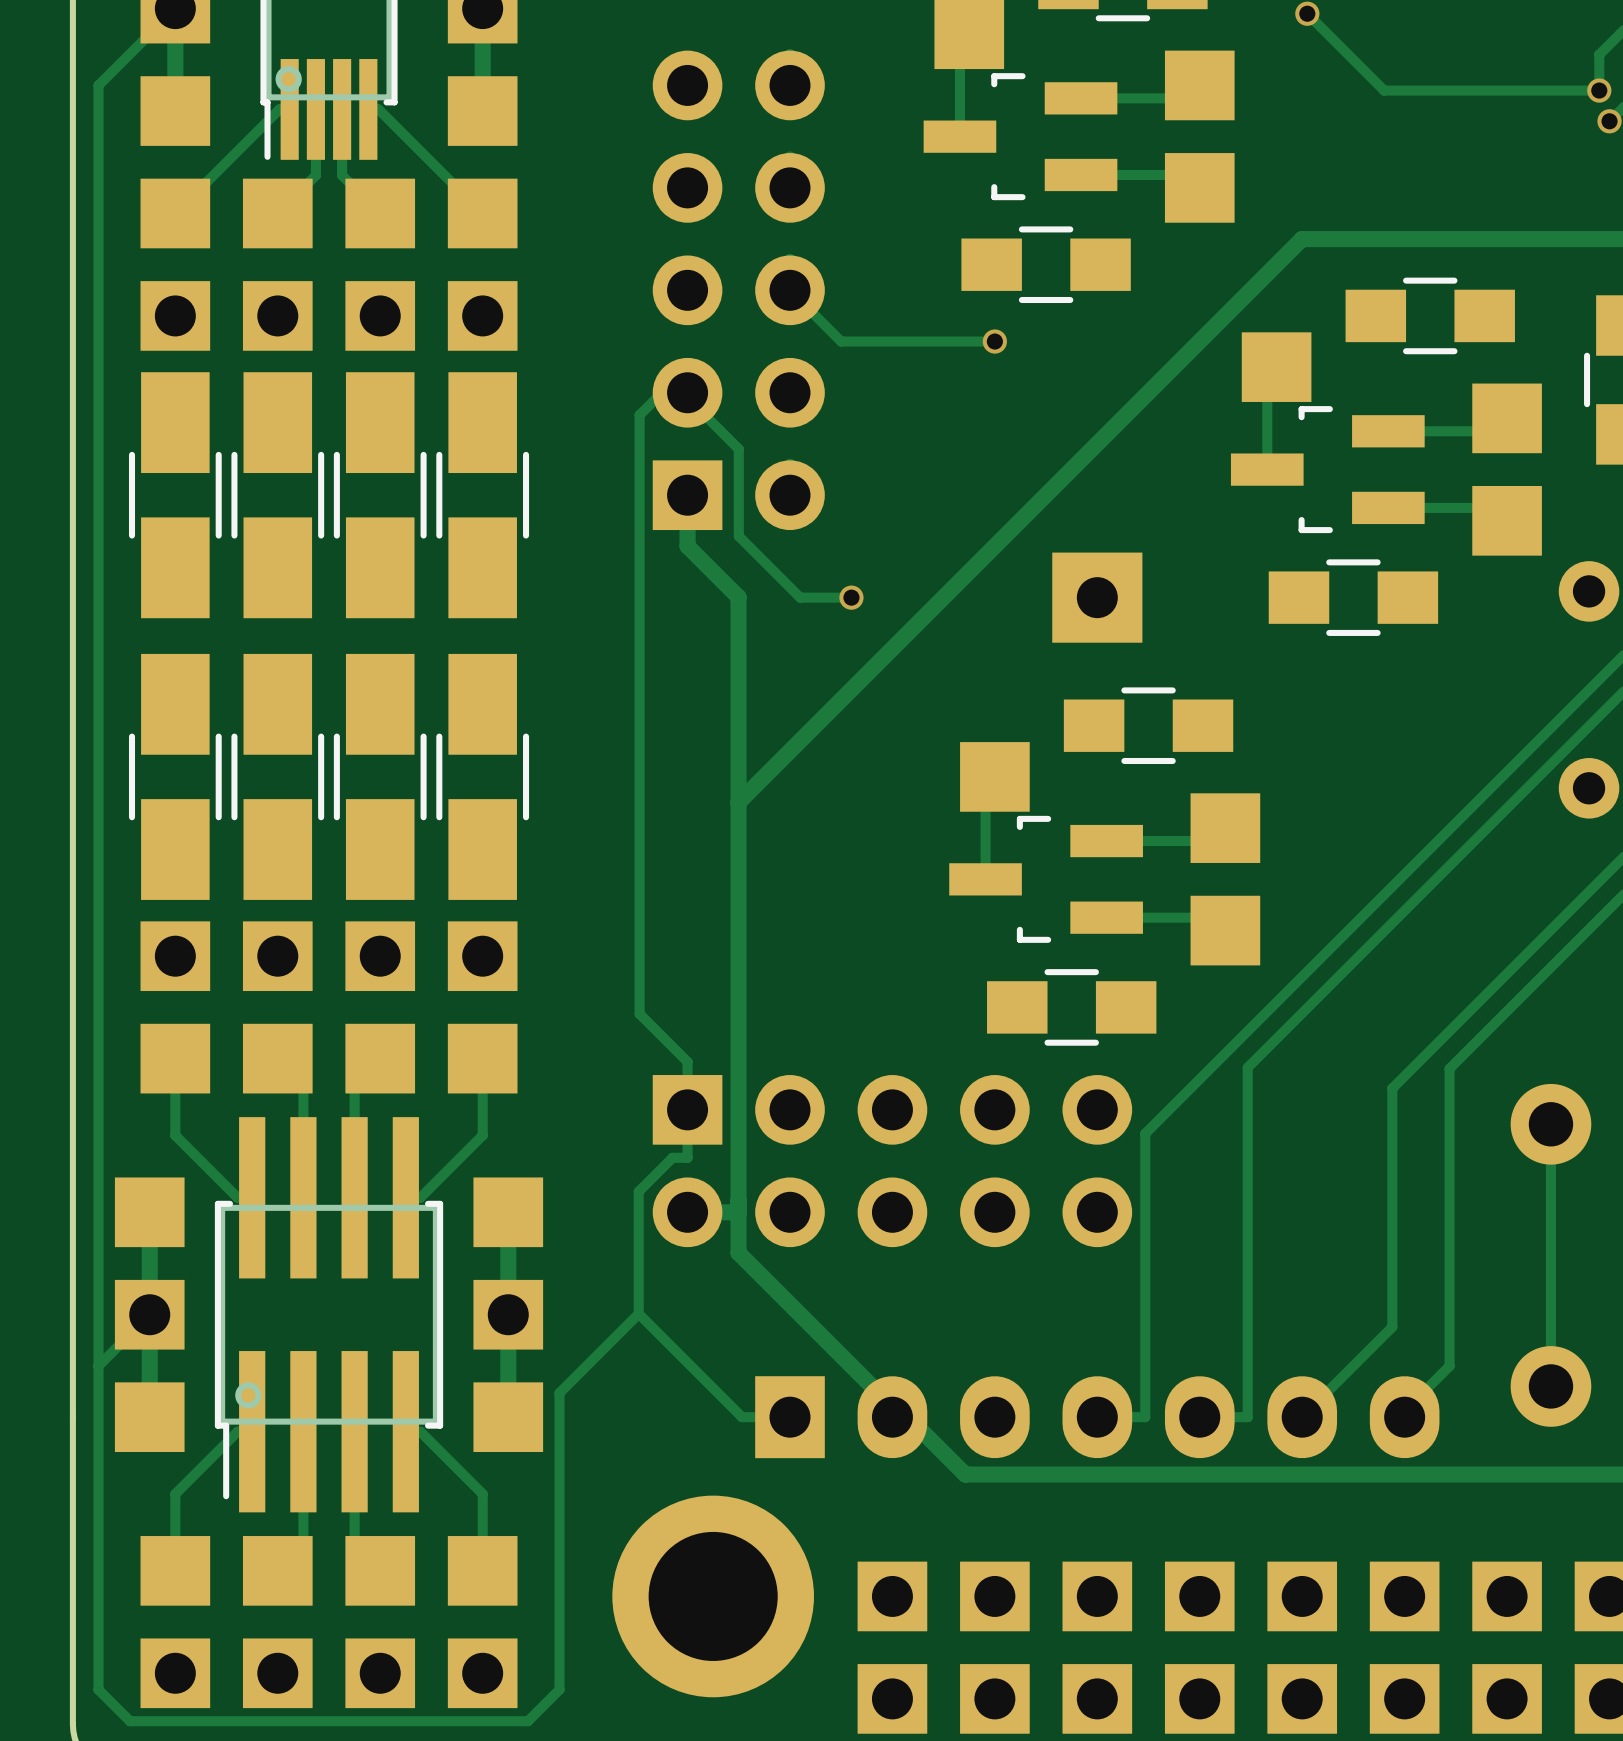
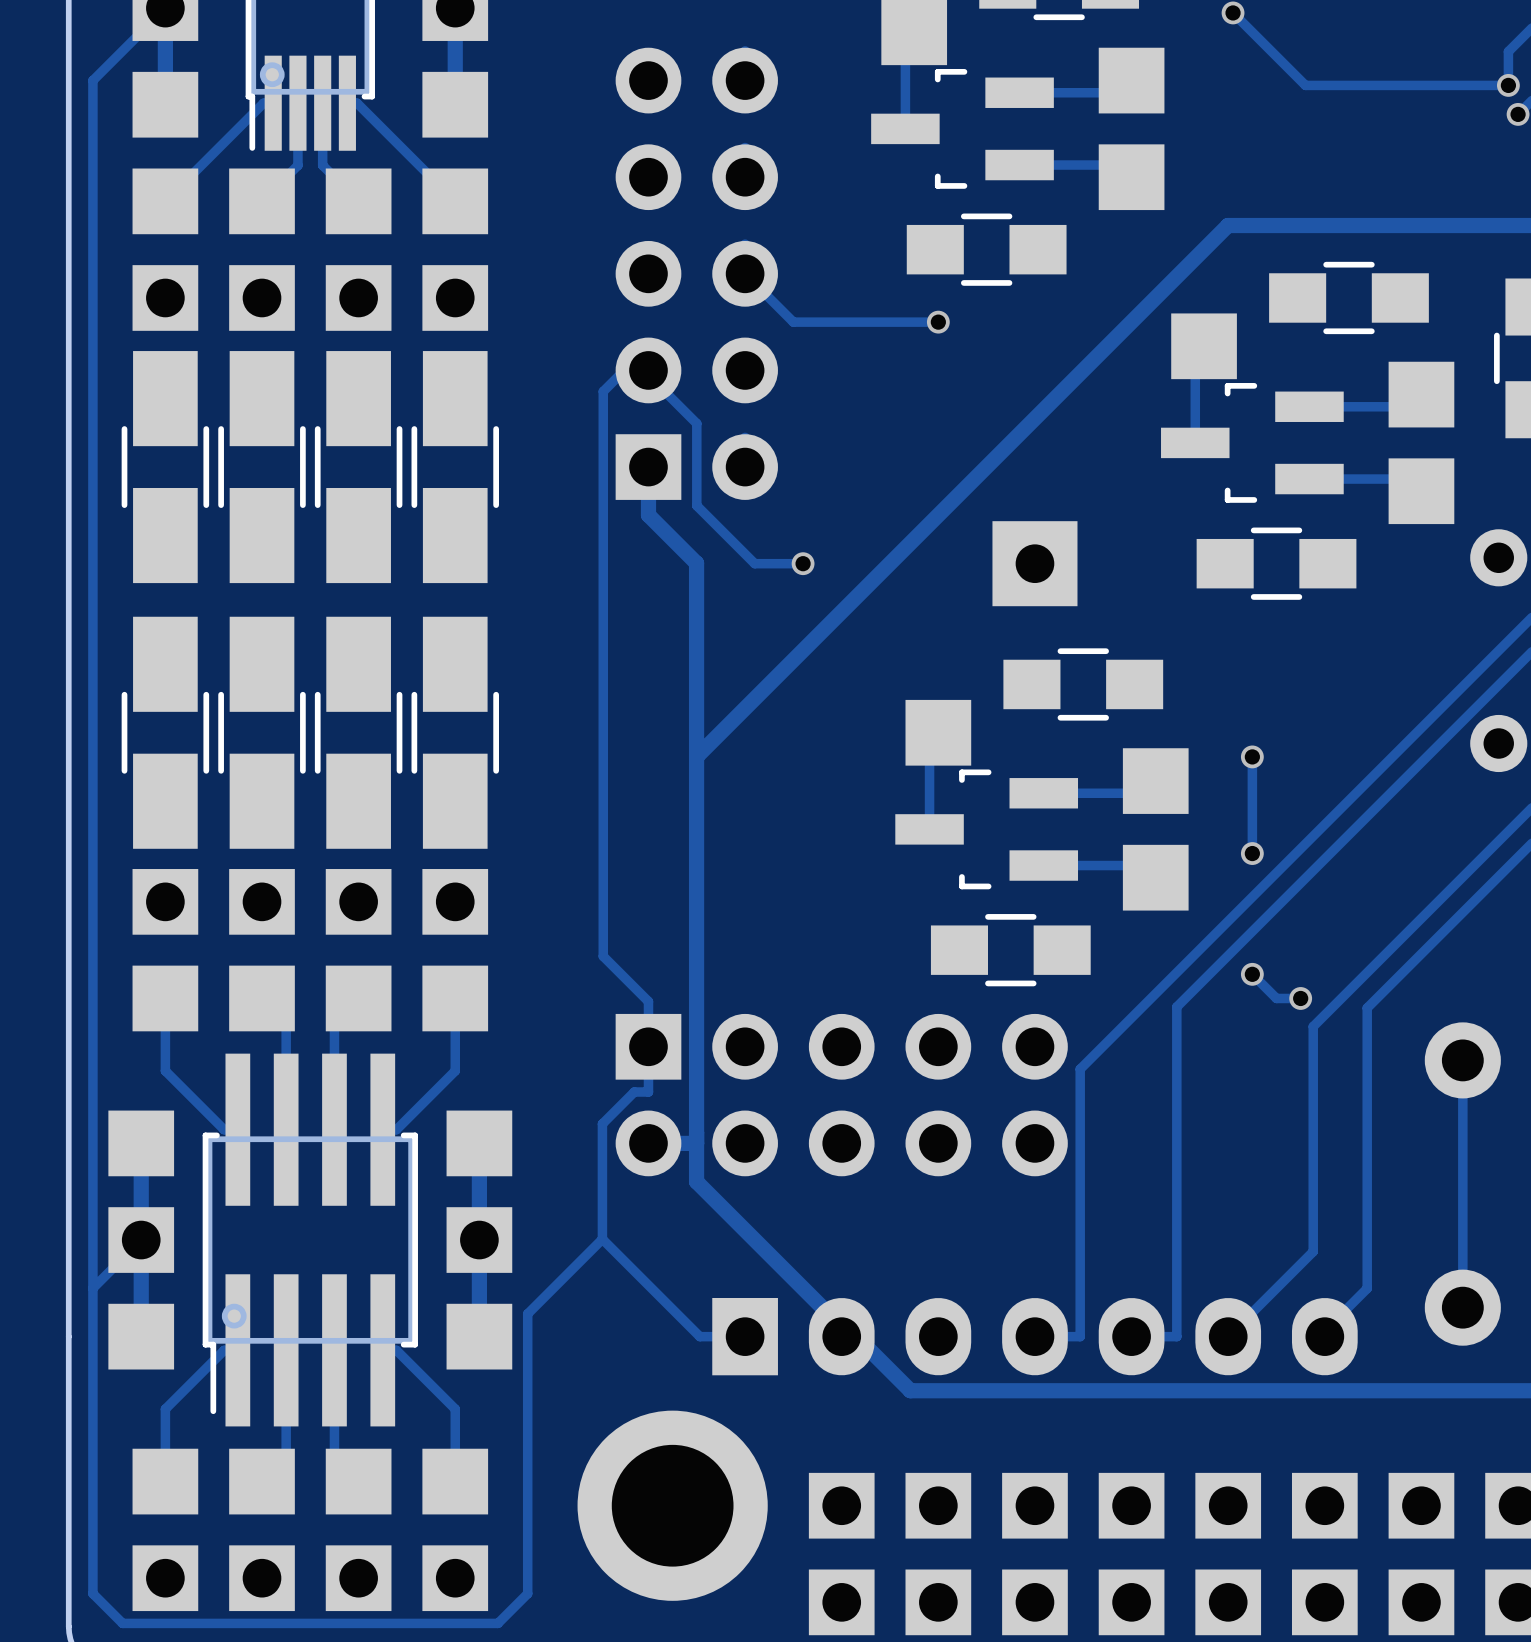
track: none -> (1252, 756) (1252, 853)
via: none -> (1252, 756)
via: none -> (1252, 853)
track: none -> (1252, 974) (1276, 998) (1300, 998)
via: none -> (1252, 974)
via: none -> (1300, 998)

